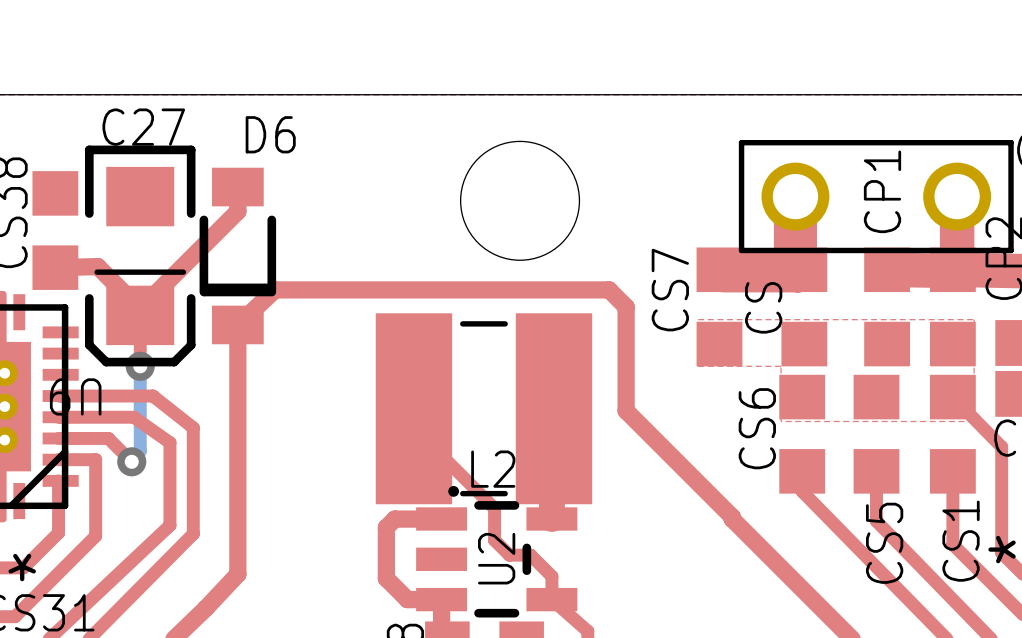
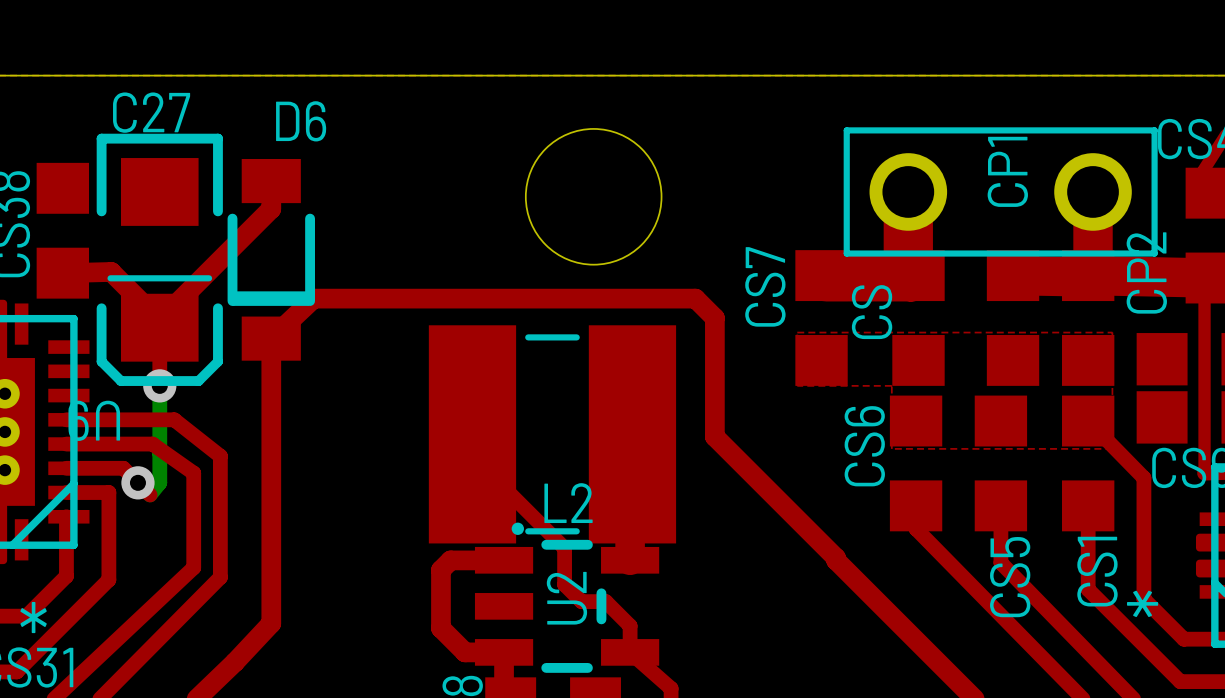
via position: (131, 461) -> (137, 482)

